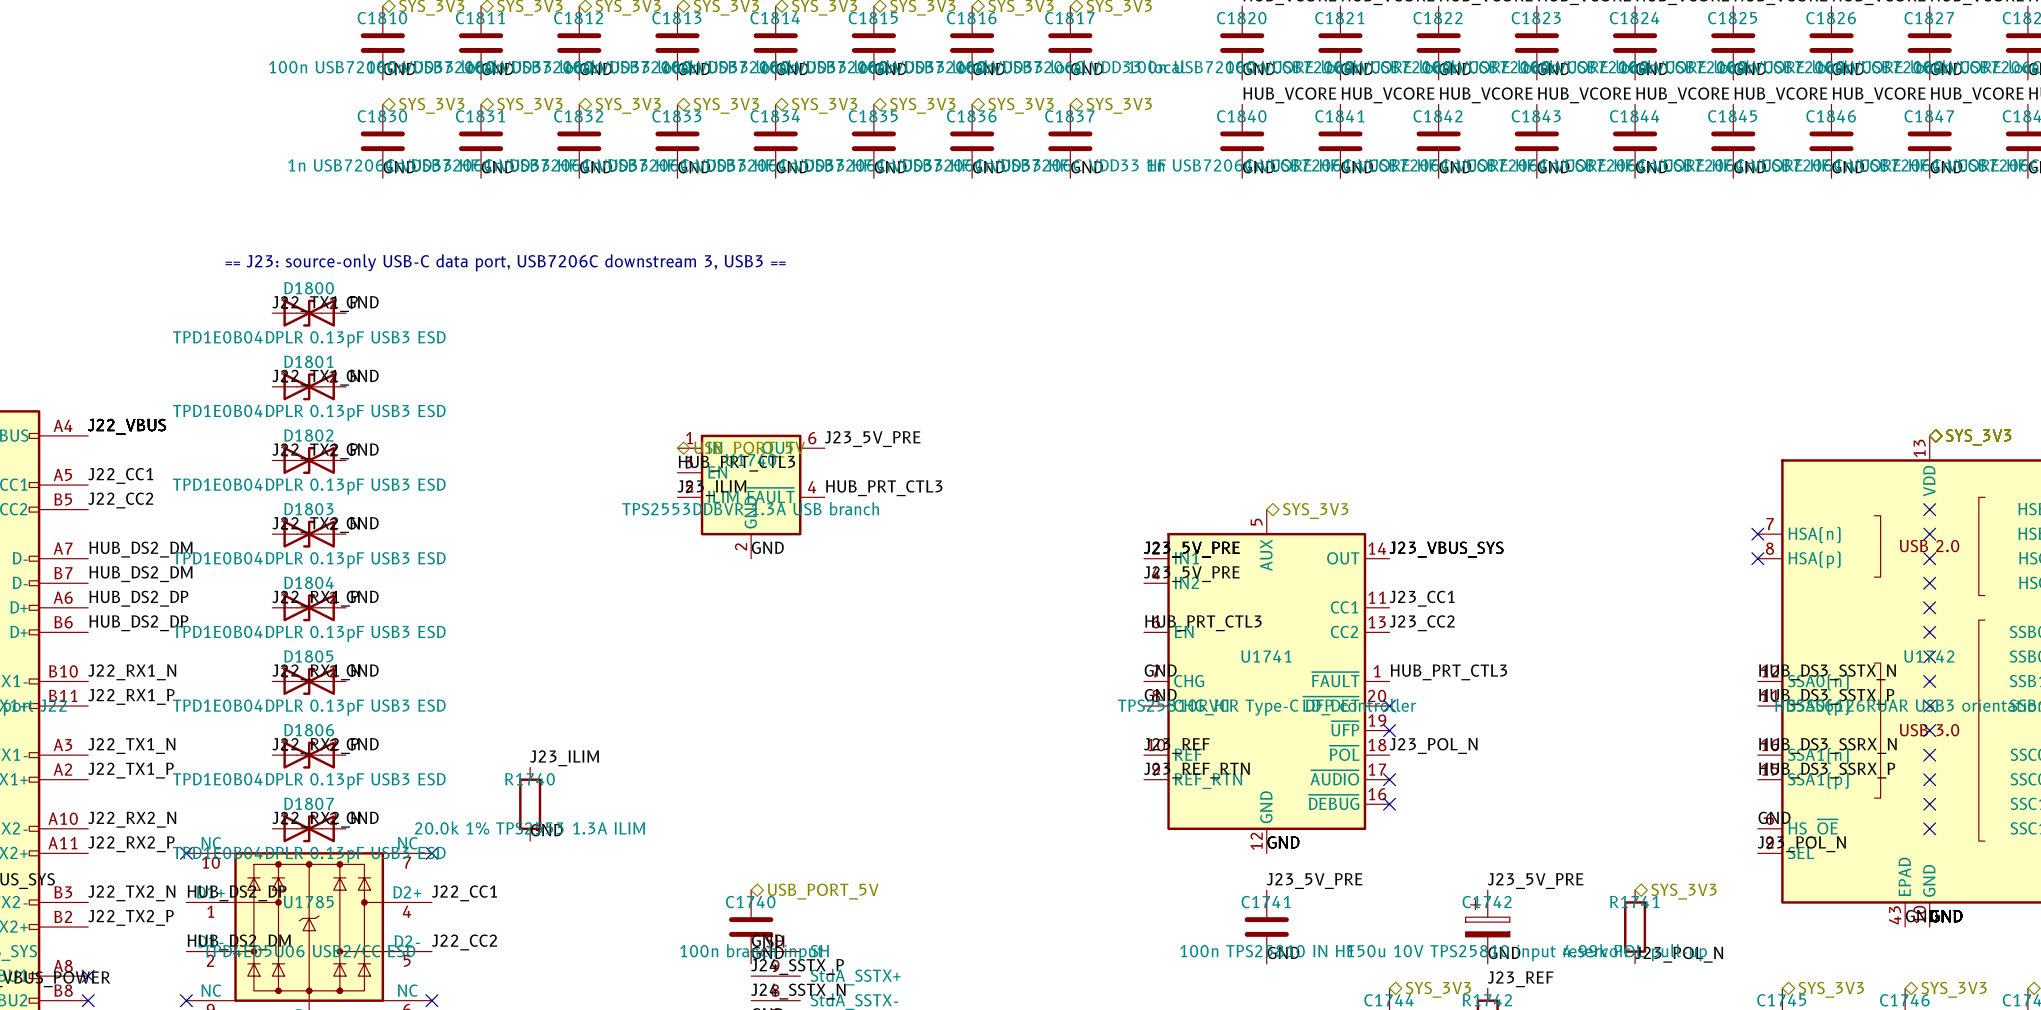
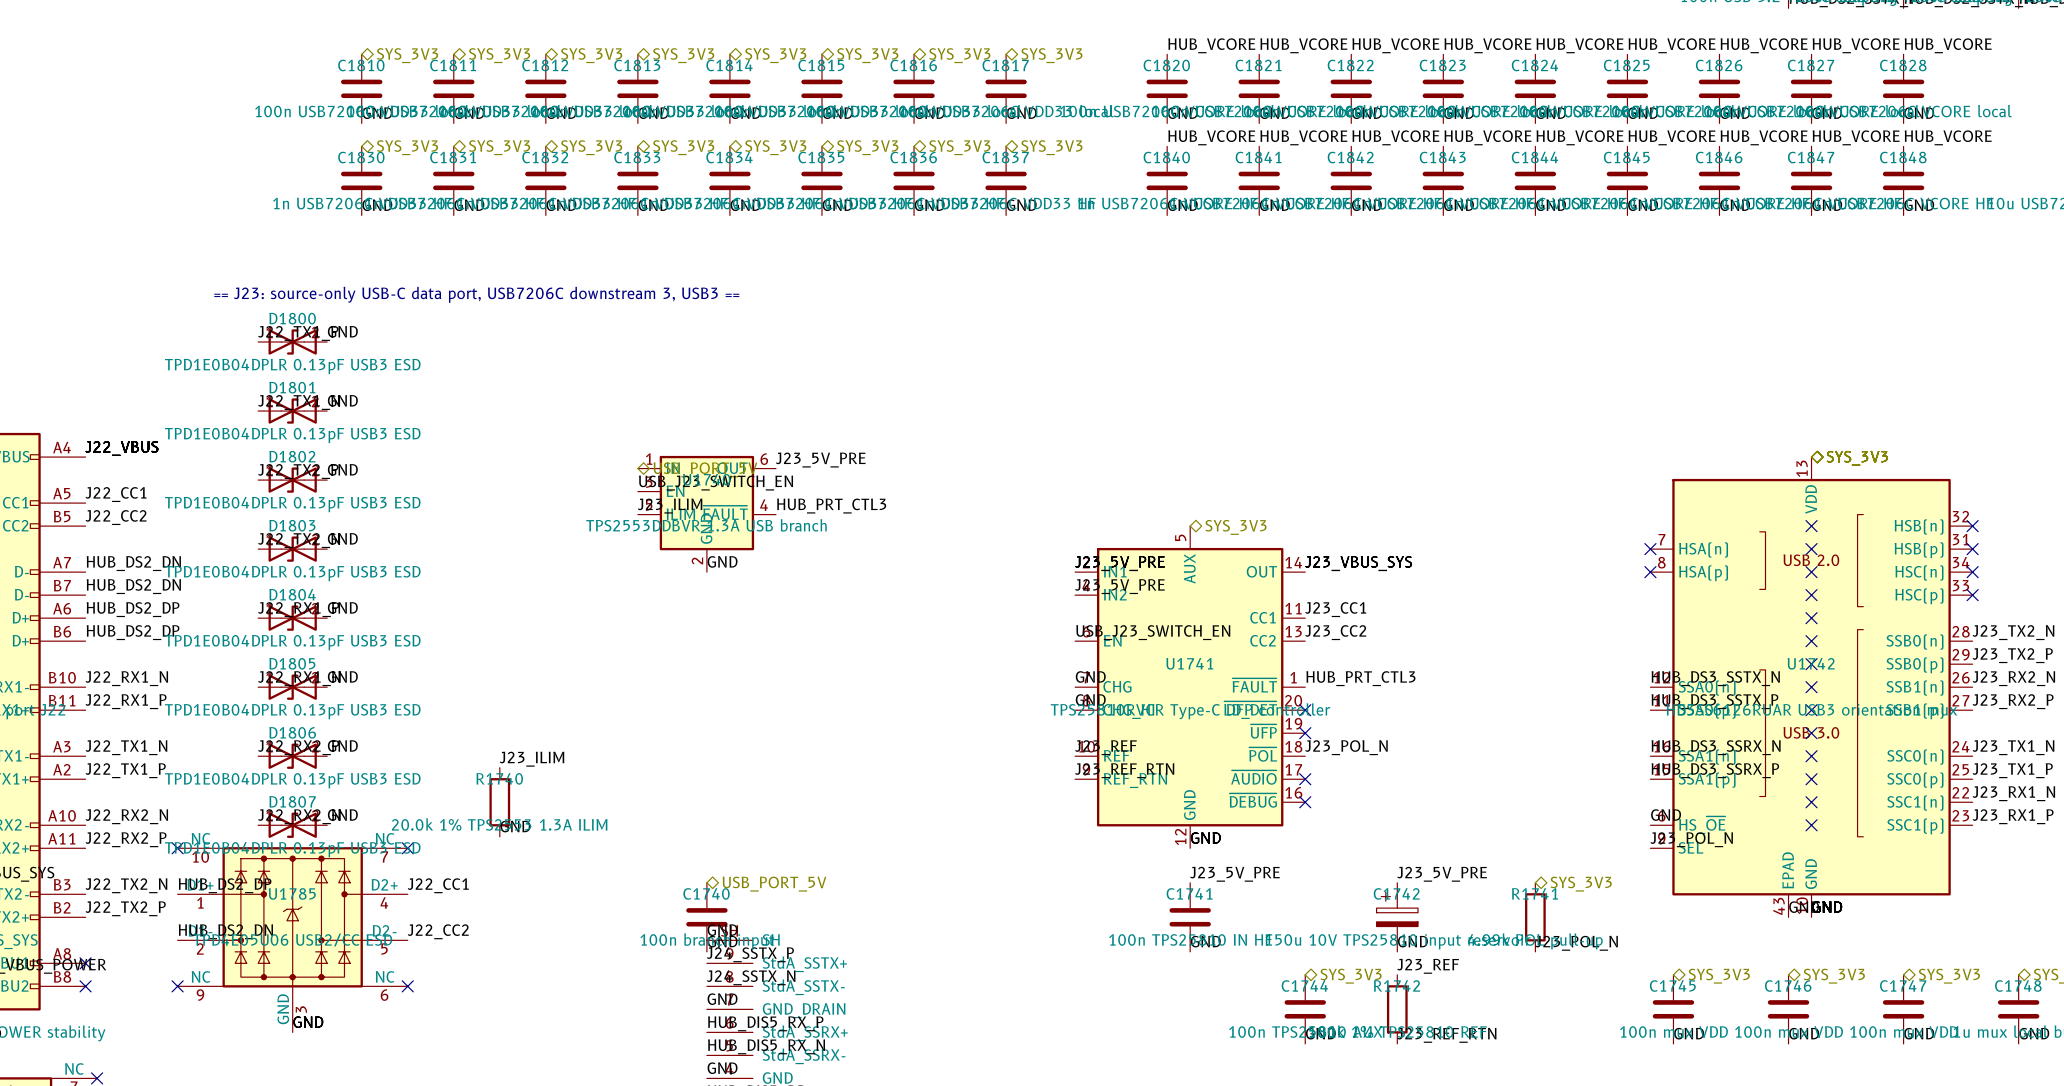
label: HUB_PRT_CTL3 (736, 463) -> USB_J23_SWITCH_EN (716, 483)
label: HUB_DS2_DM (140, 549) -> HUB_DS2_DN (133, 563)
label: HUB_DS2_DM (140, 574) -> HUB_DS2_DN (133, 586)
label: HUB_PRT_CTL3 (1203, 623) -> USB_J23_SWITCH_EN (1153, 632)
label: HUB_DS2_DM (239, 942) -> HUB_DS2_DN (225, 931)

